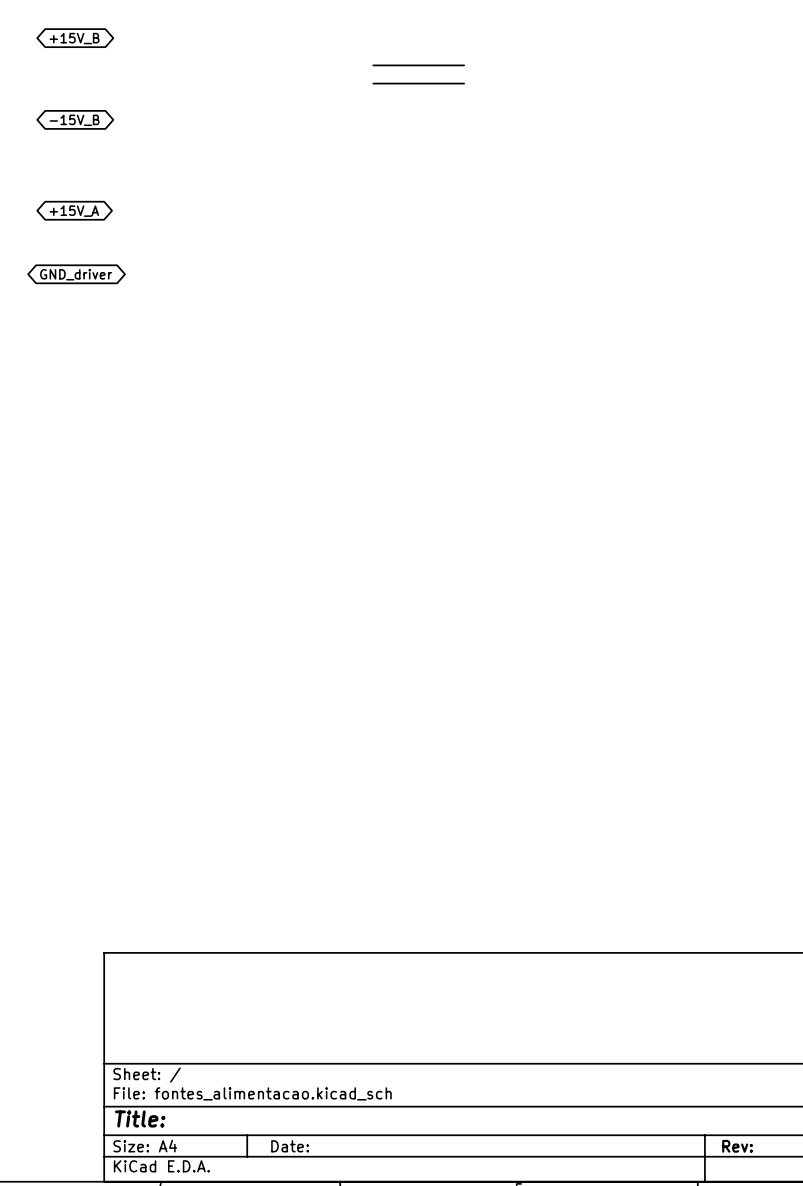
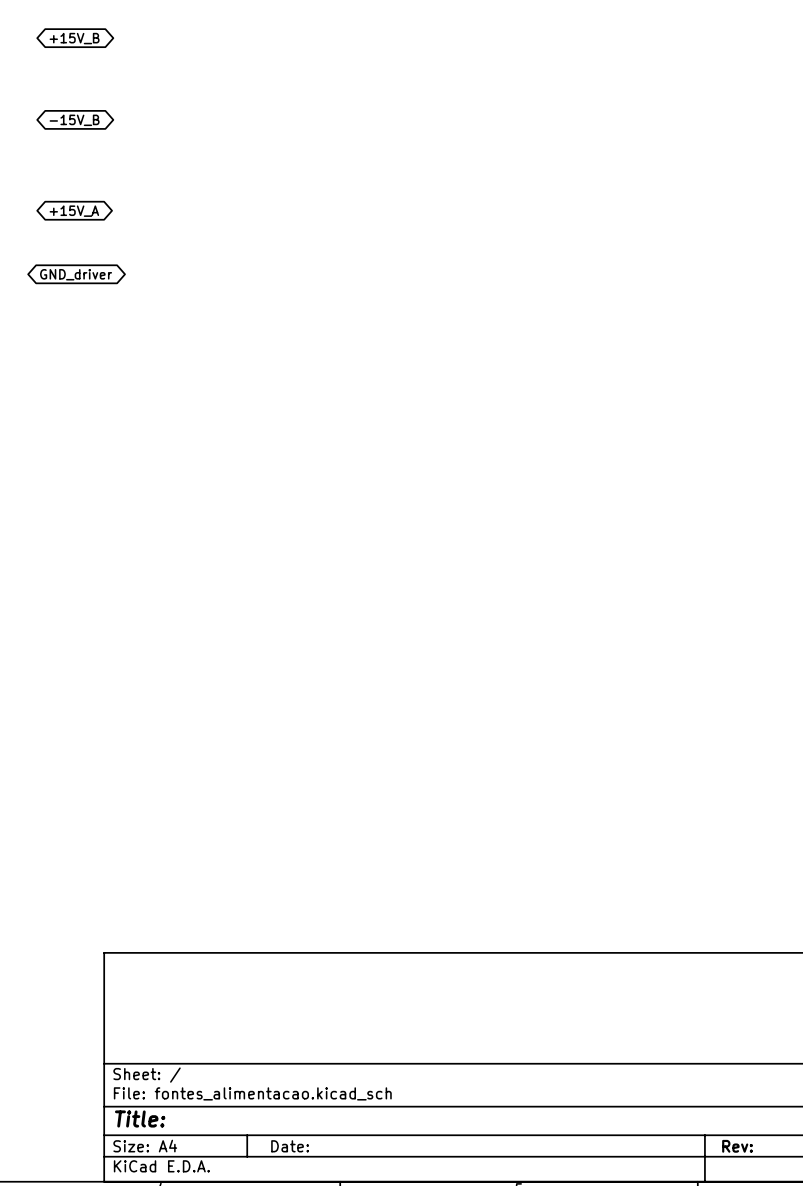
wire: (373, 65) (464, 65) -> none
wire: (373, 83) (464, 83) -> none

